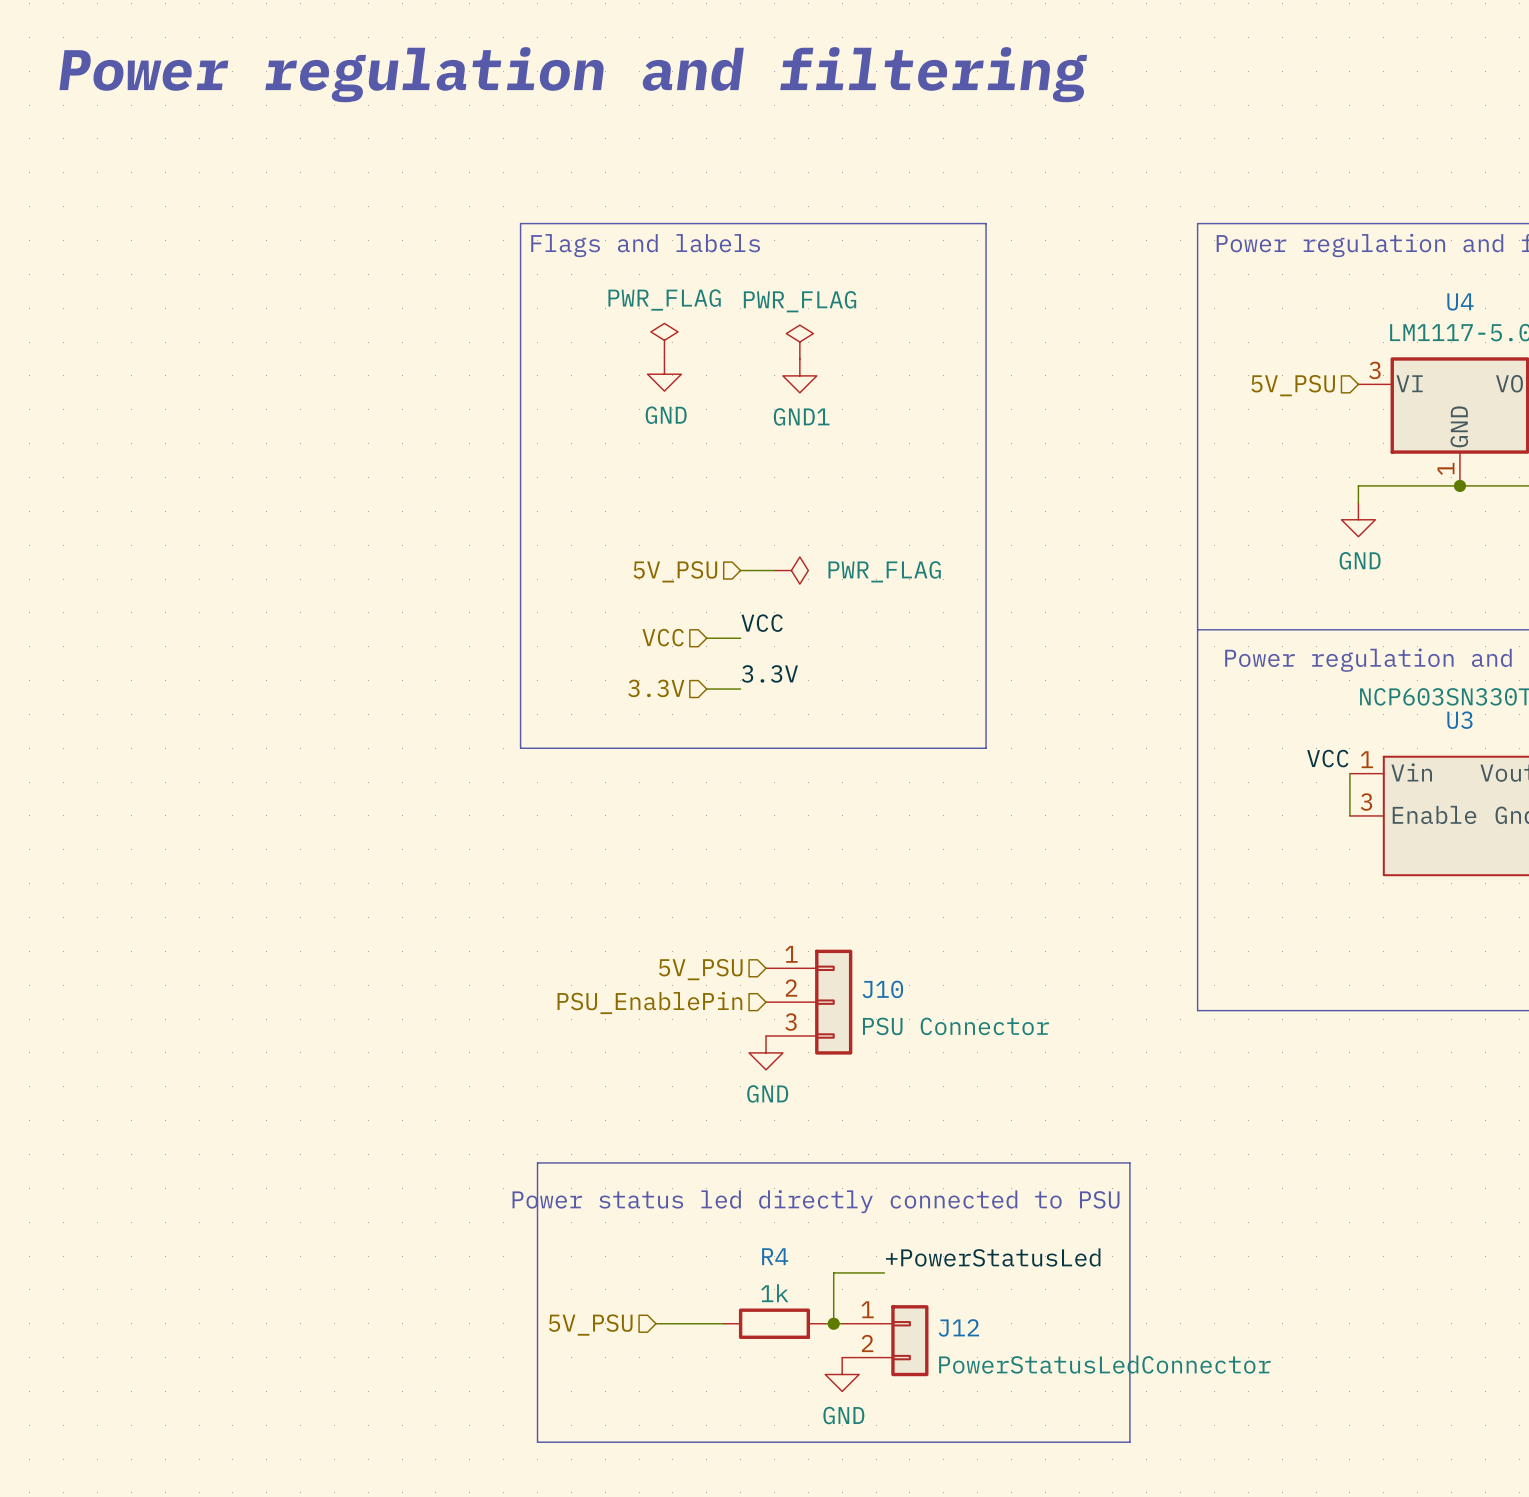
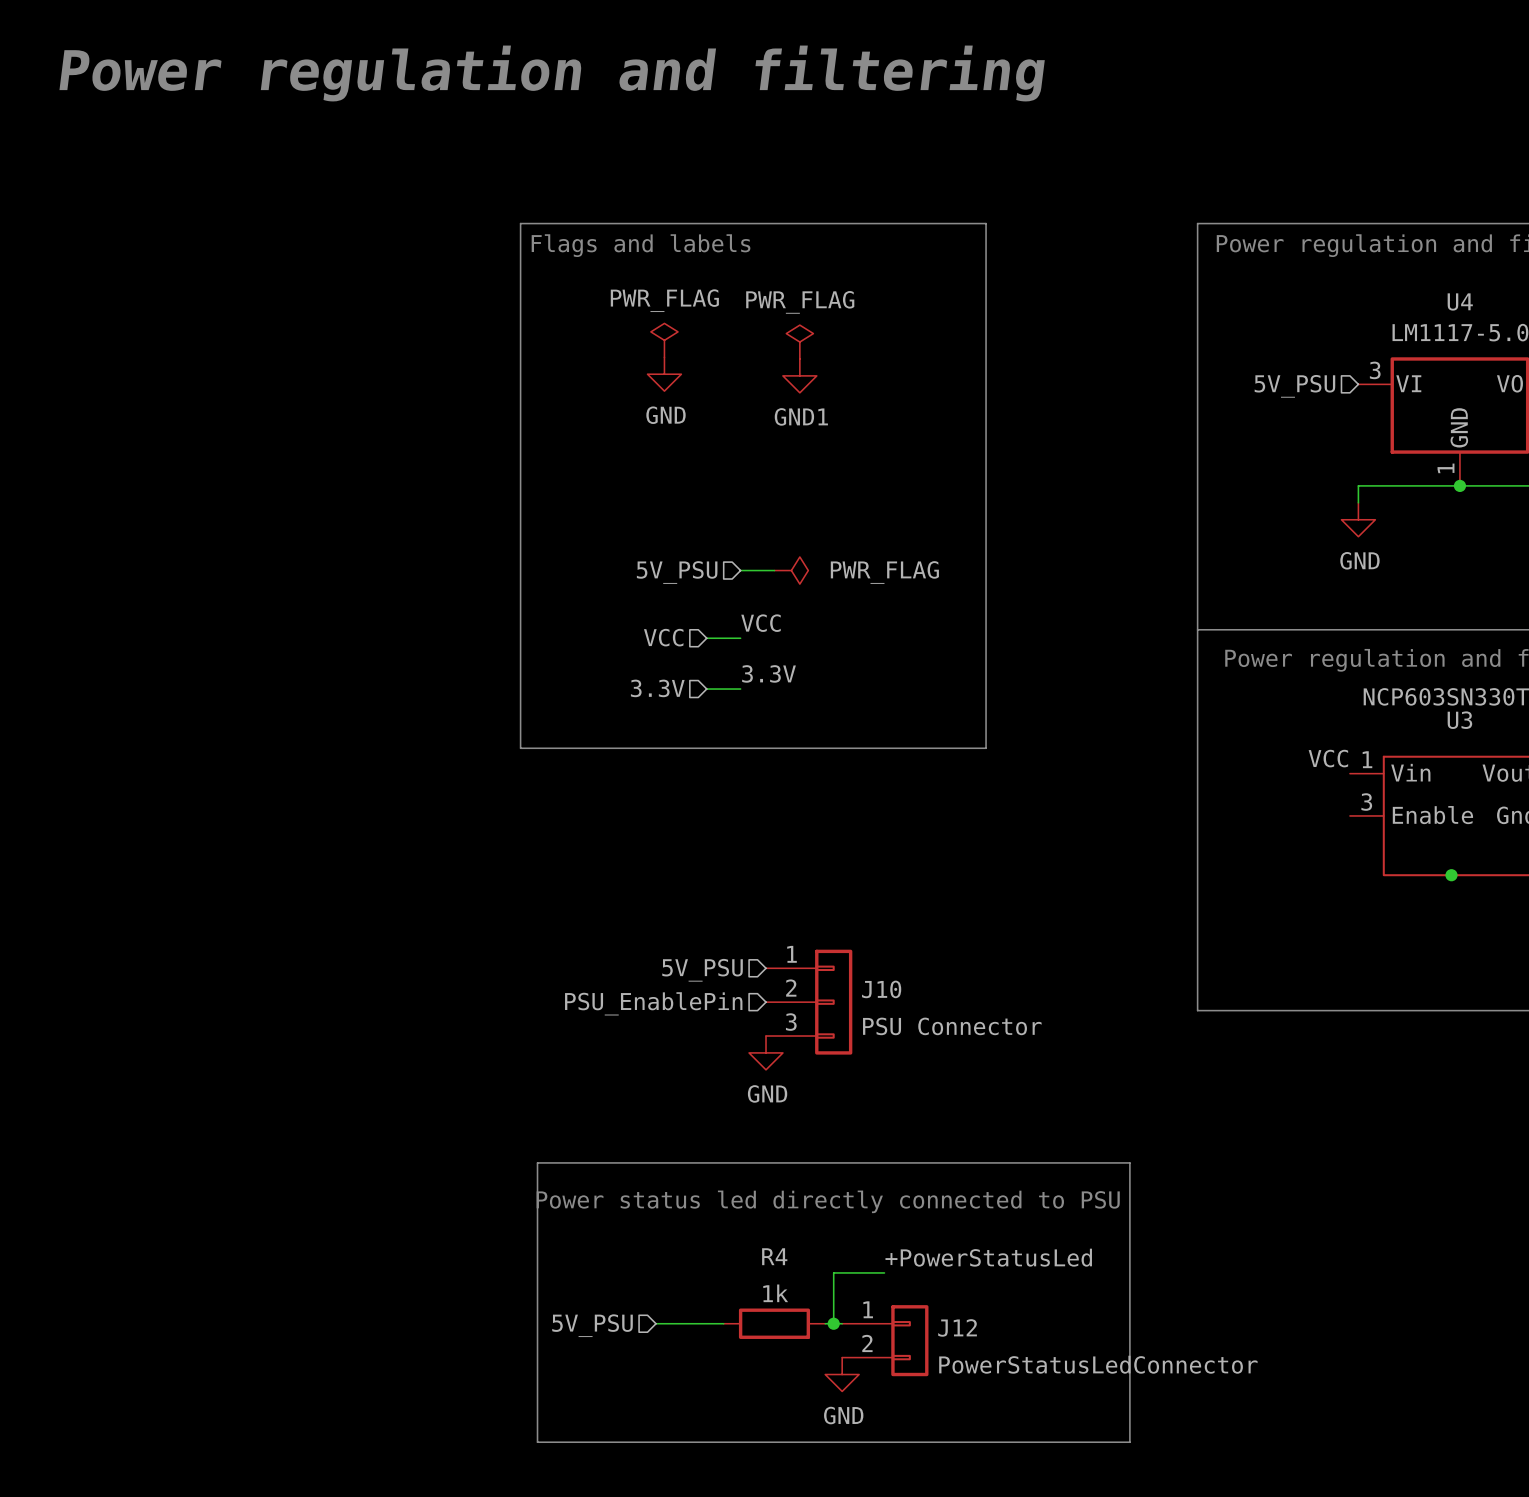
wire: (1349, 773) (1349, 815) -> none
junction: none -> (1451, 875)

